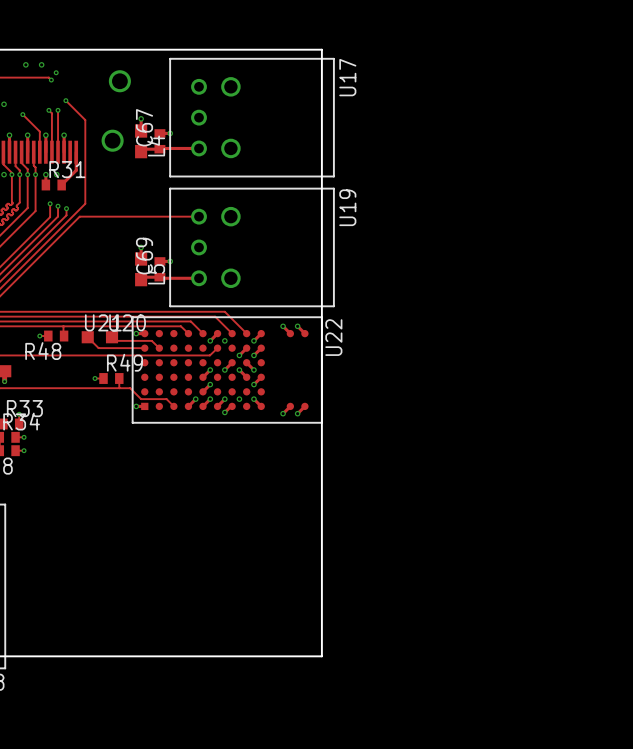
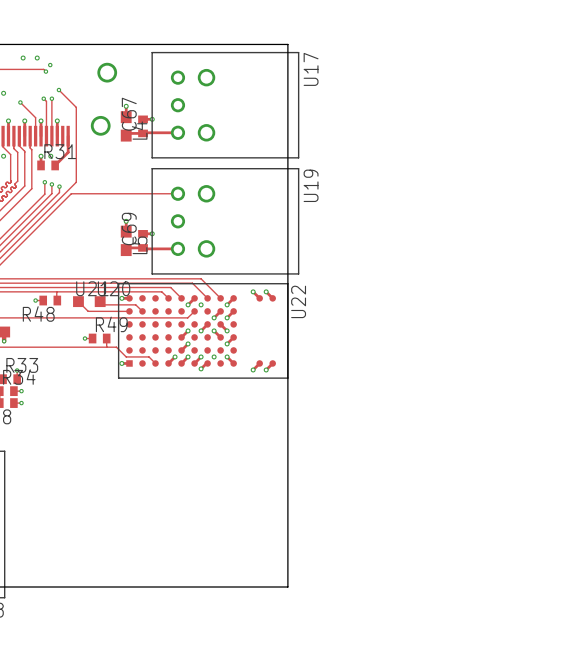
via: (11, 174) -> none
via: (19, 174) -> none
via: (27, 174) -> none
via: (35, 174) -> none

